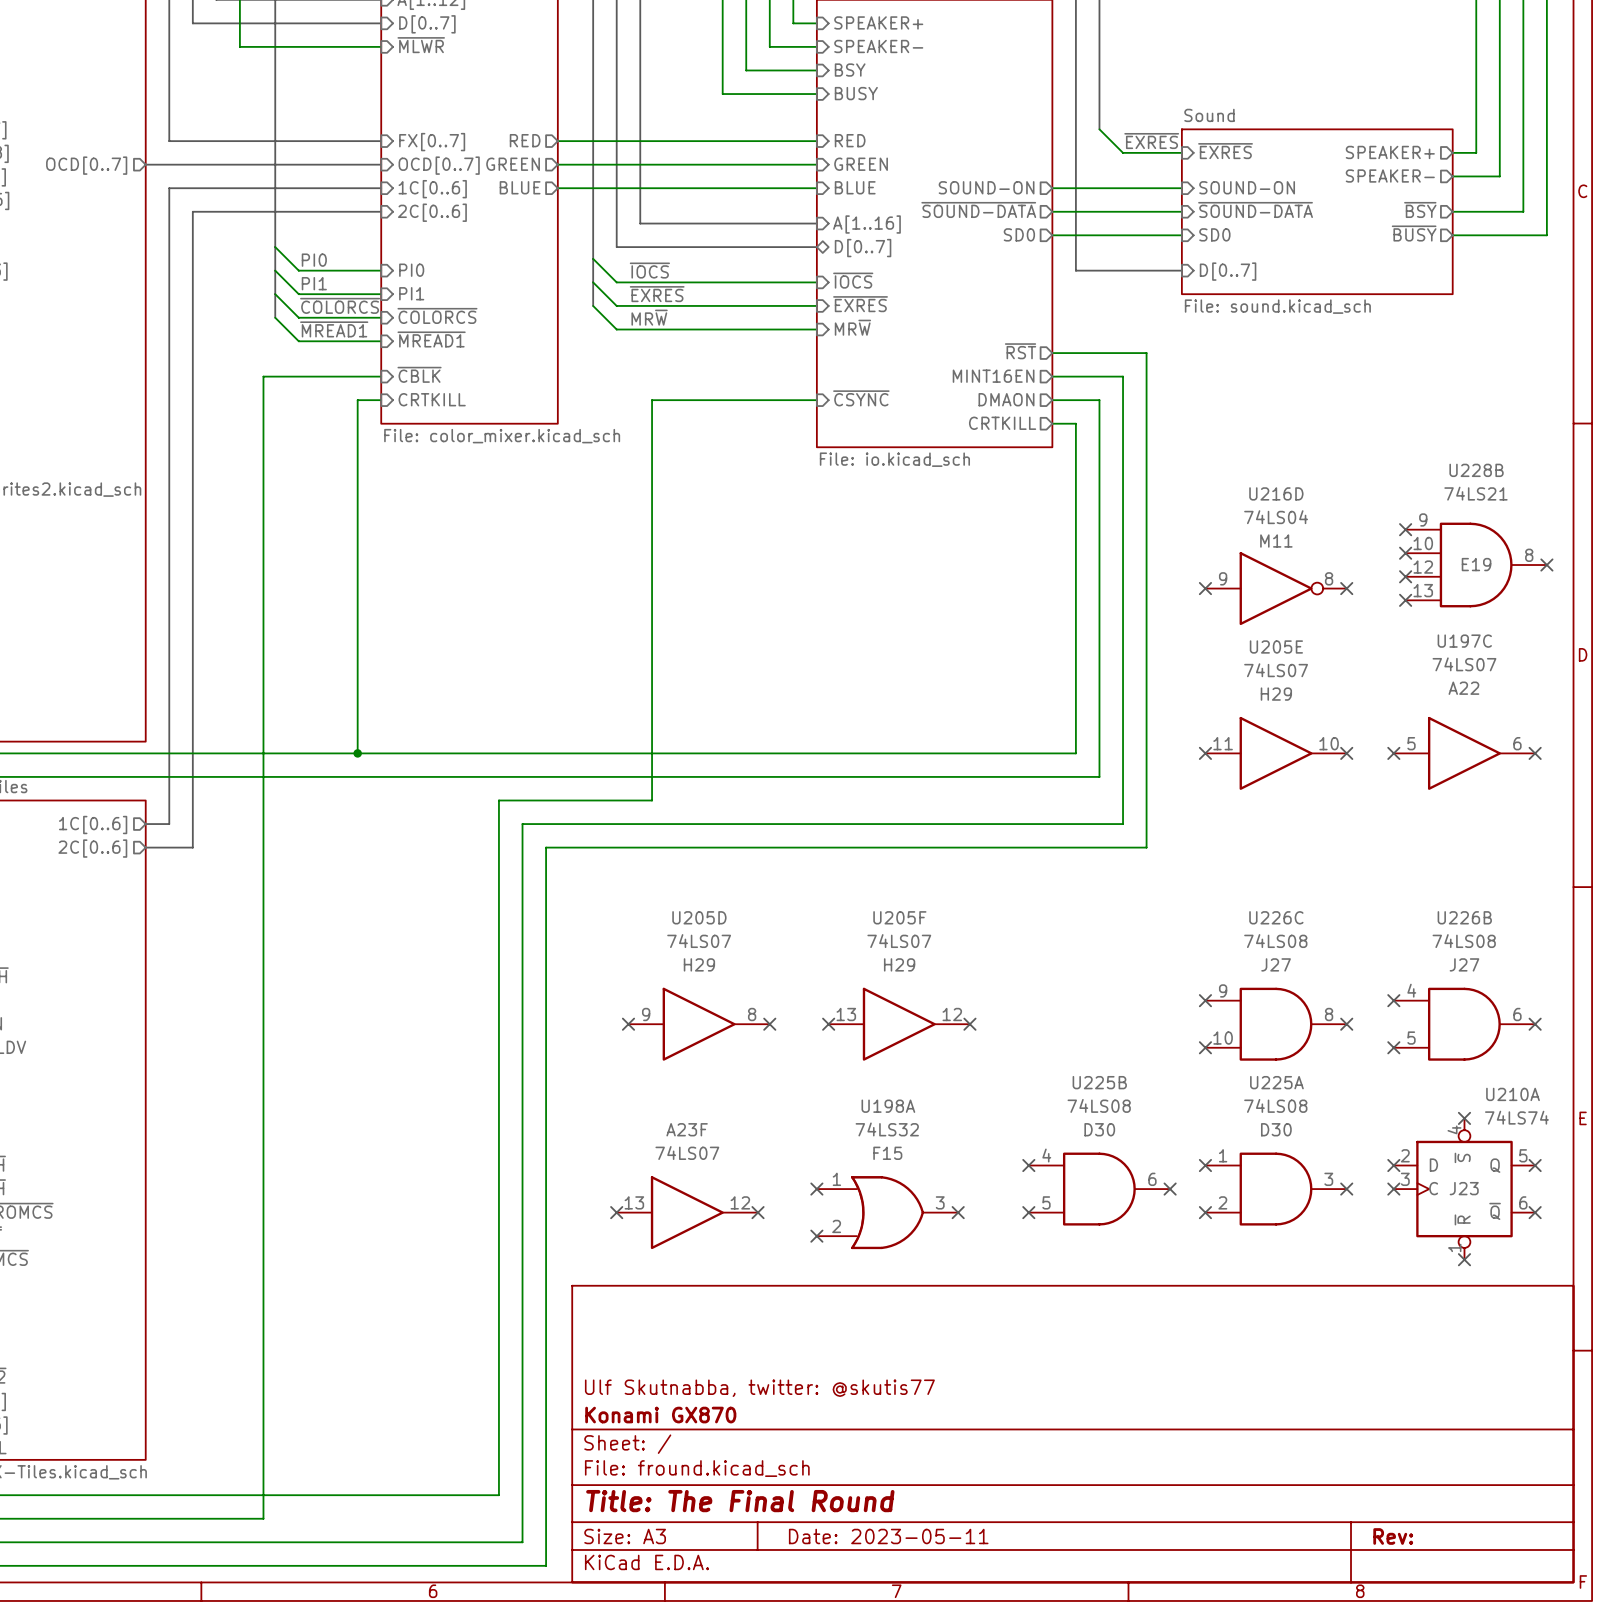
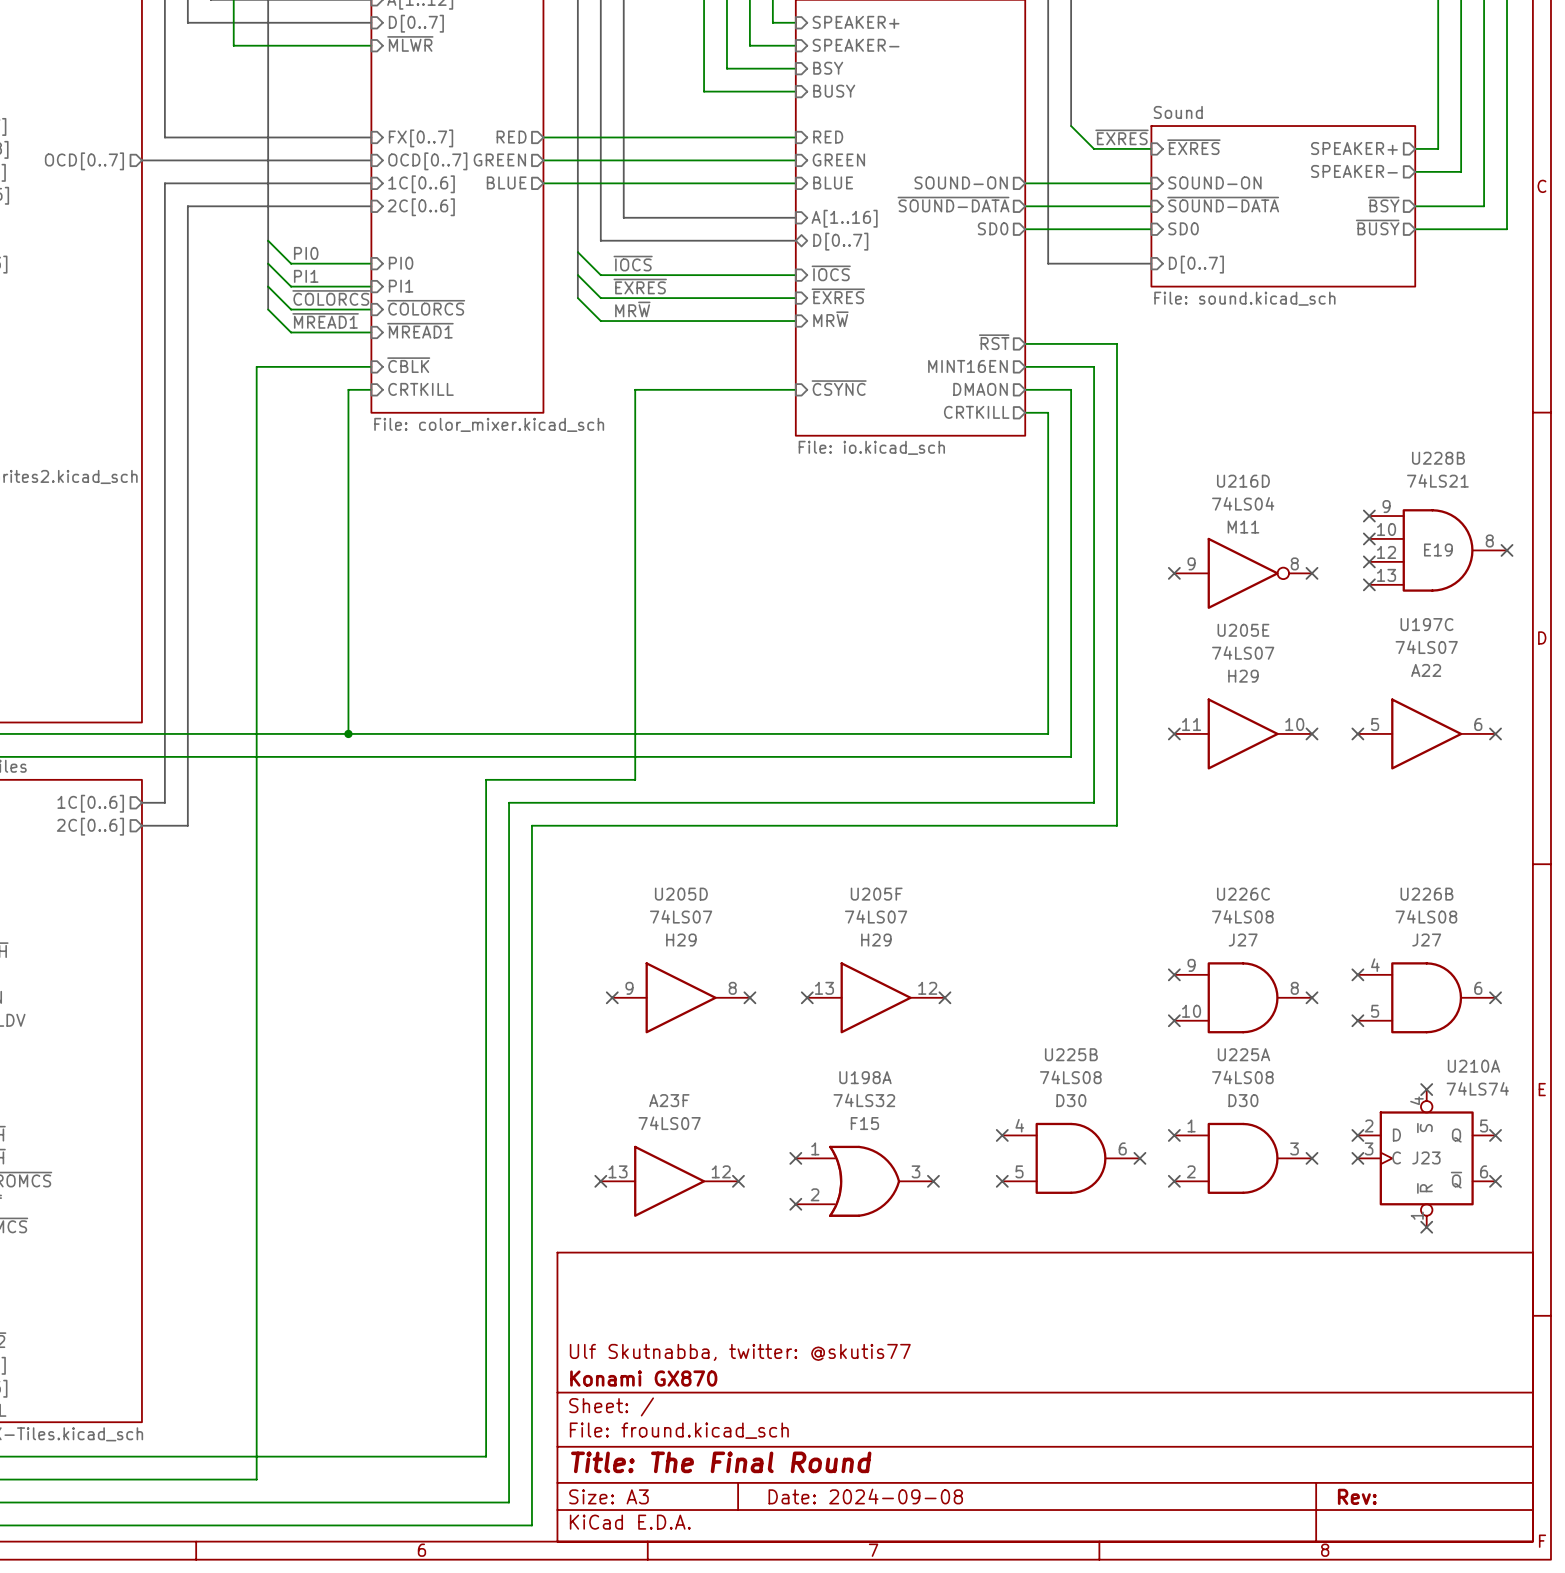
title block: Date: 2023-05-11 (888, 1536) -> Date: 2024-09-08 (865, 1496)

